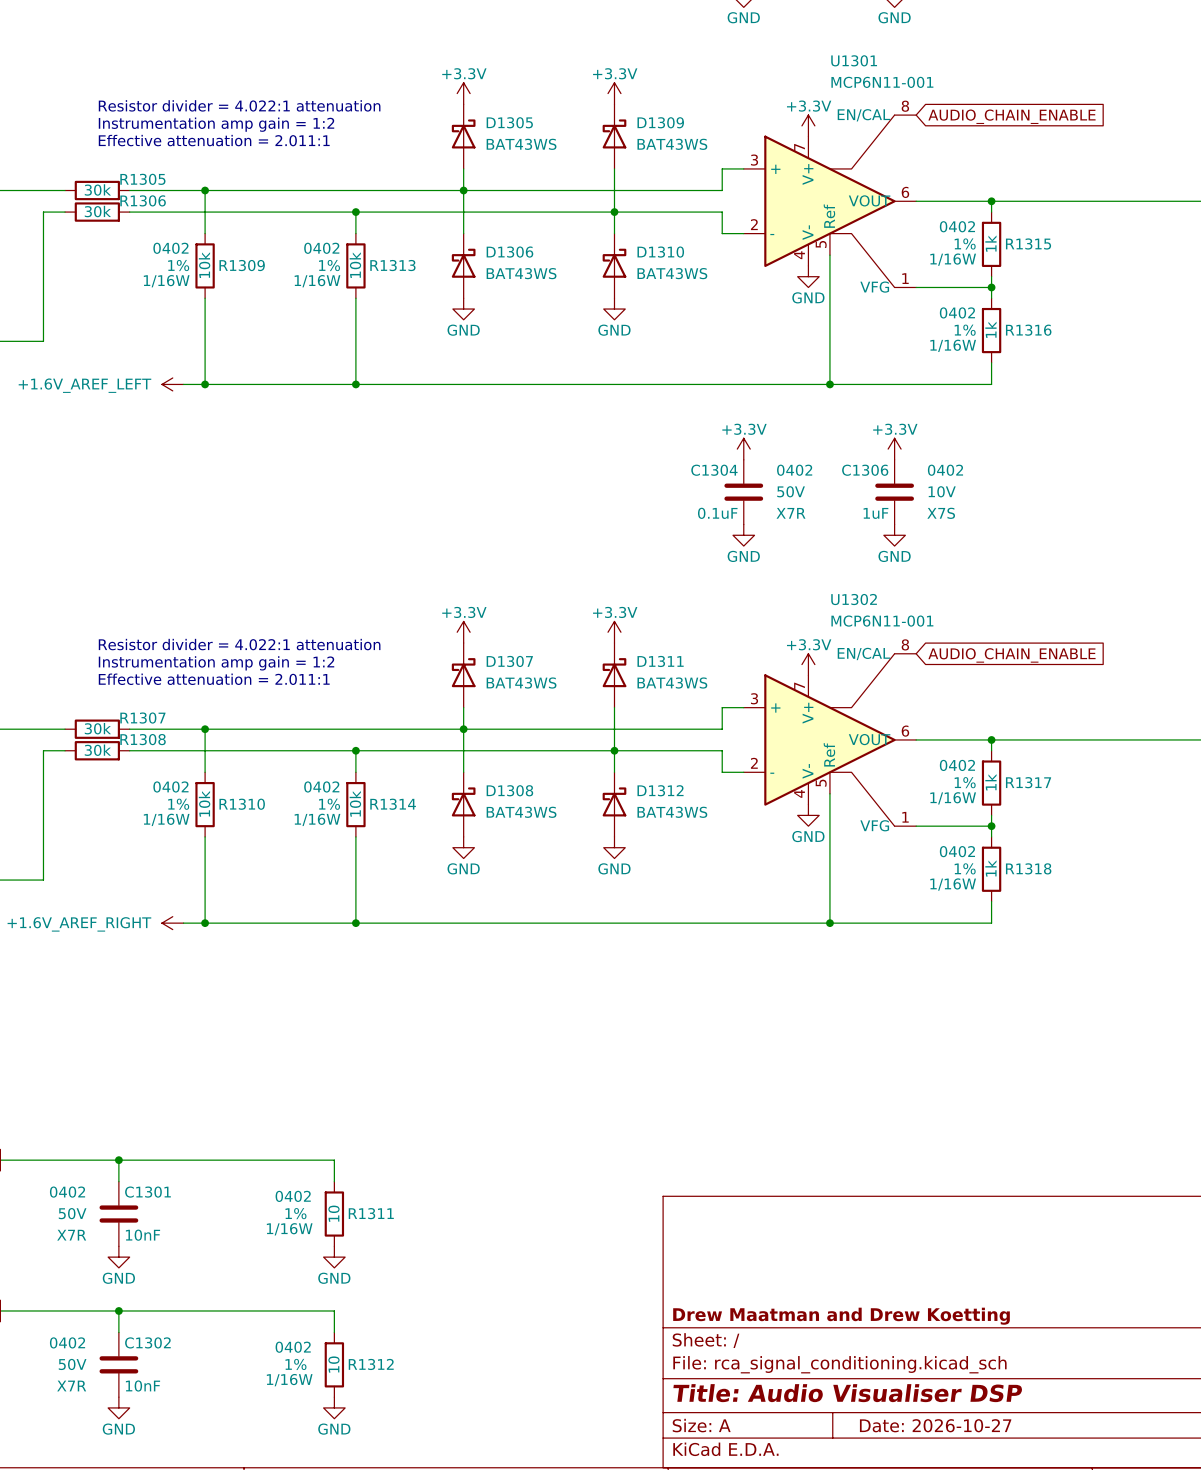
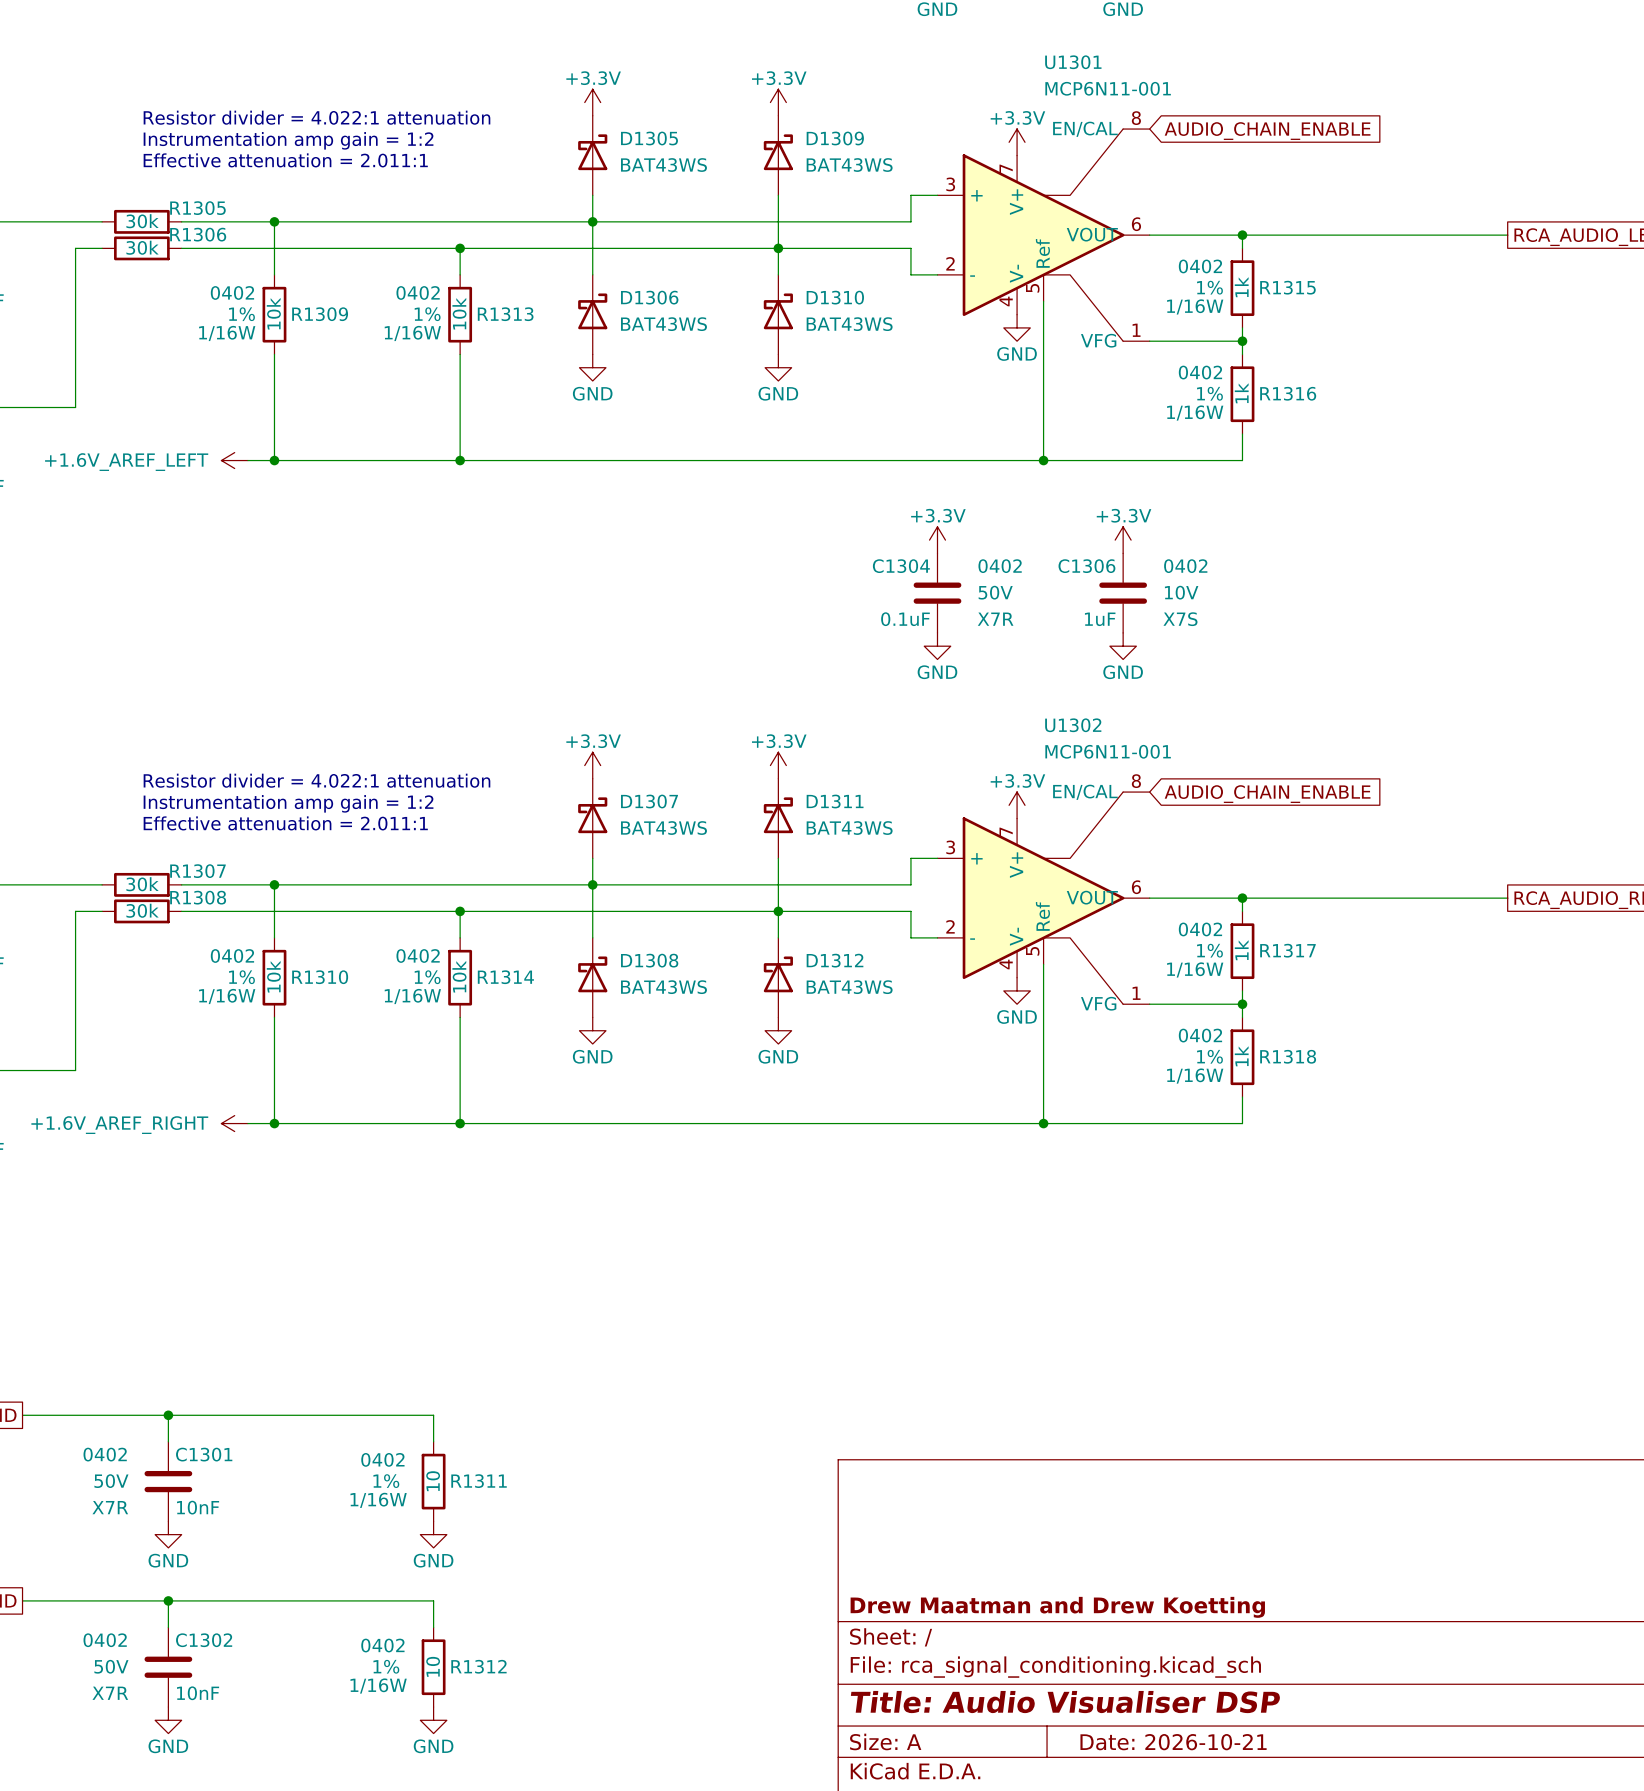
title block: Date: 2026-10-27 (935, 1425) -> Date: 2026-10-21 (1173, 1742)

